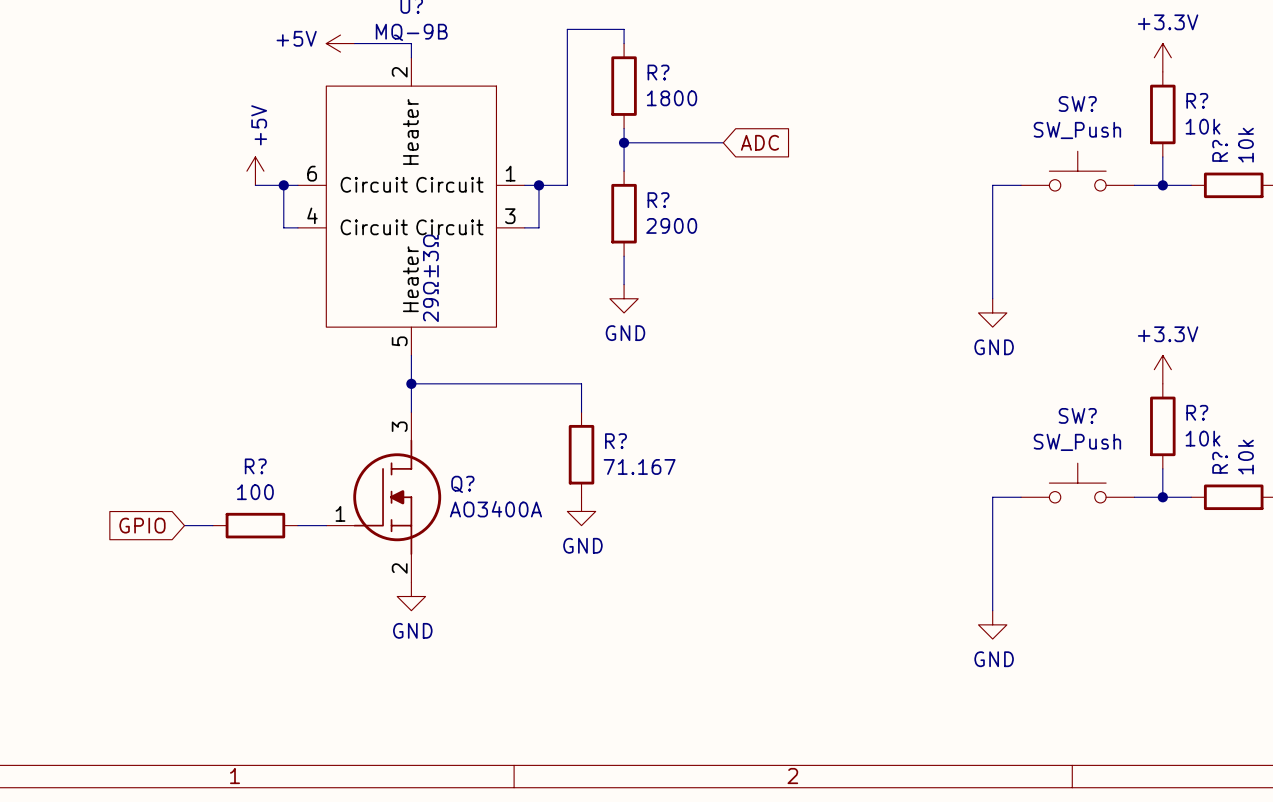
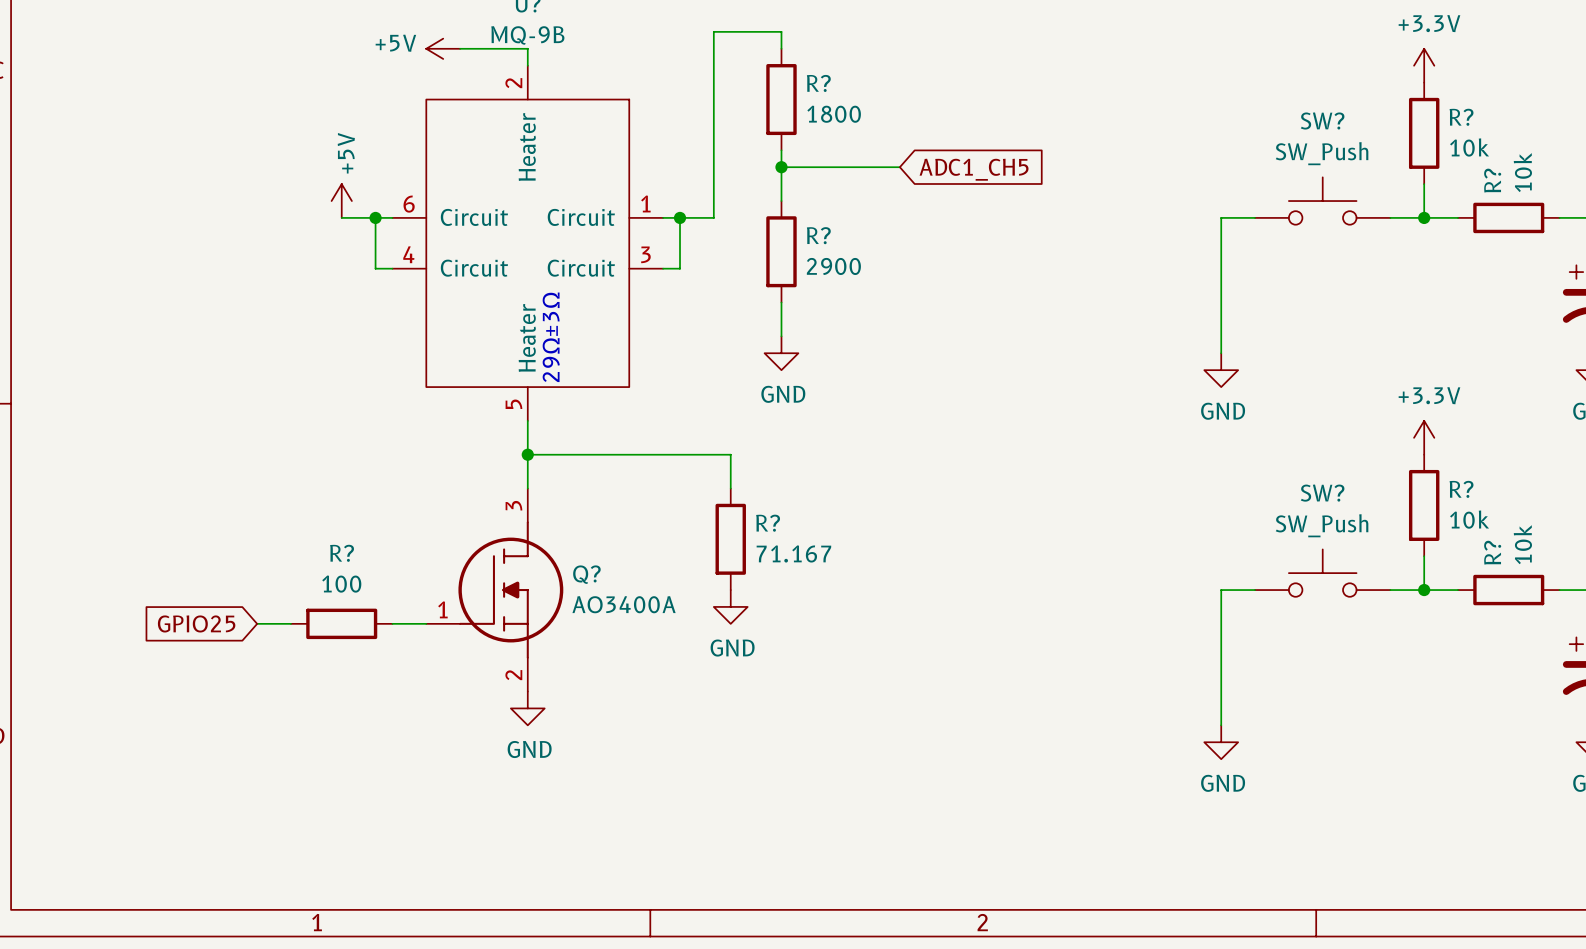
global label: ADC (759, 142) -> ADC1_CH5 (974, 169)
global label: GPIO (142, 525) -> GPIO25 (196, 623)

